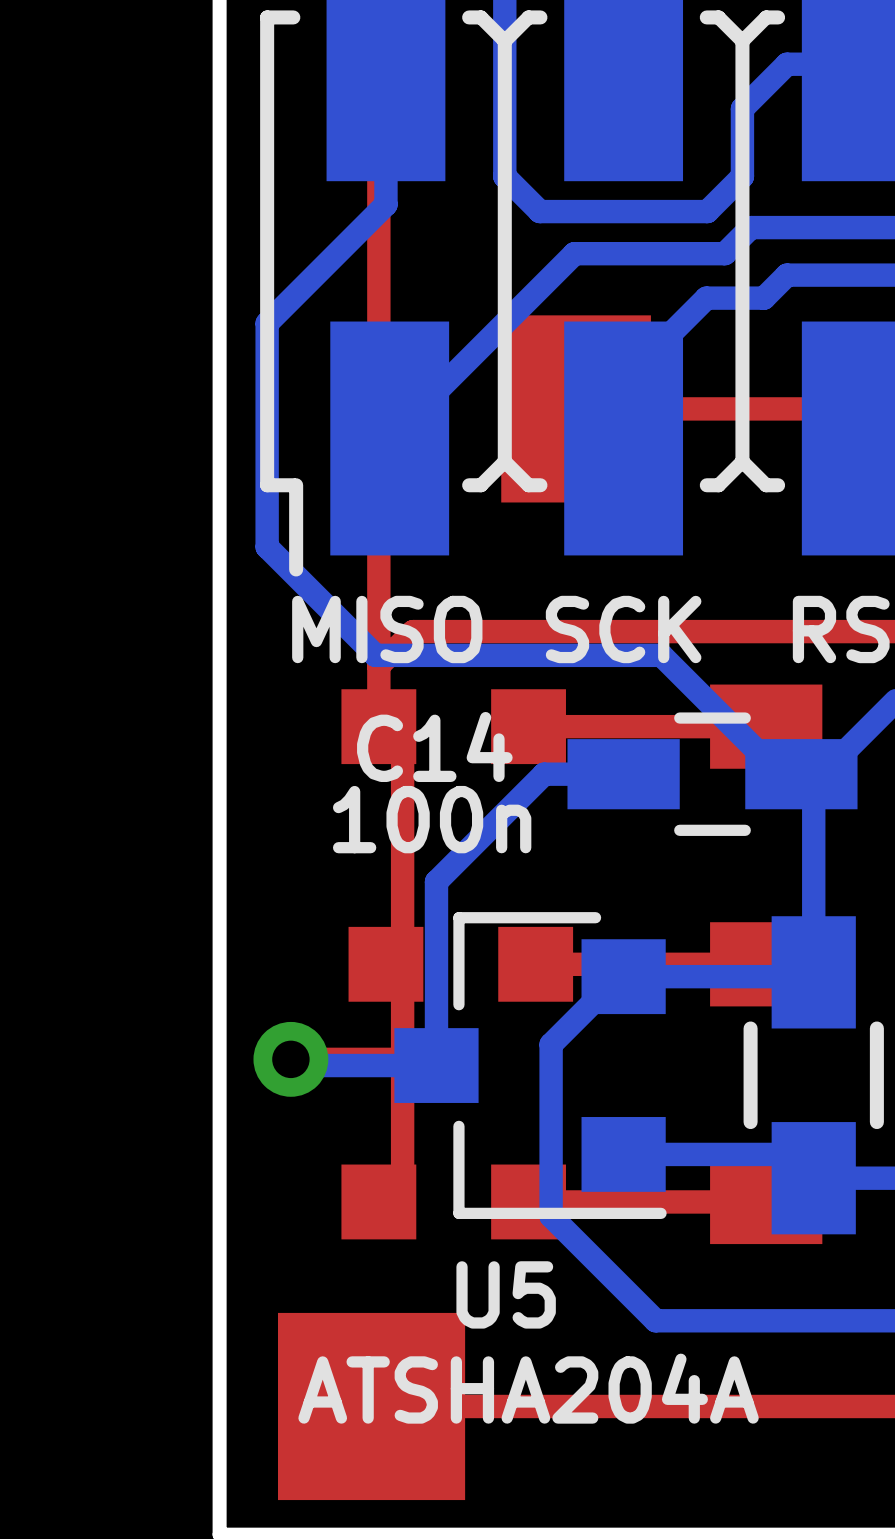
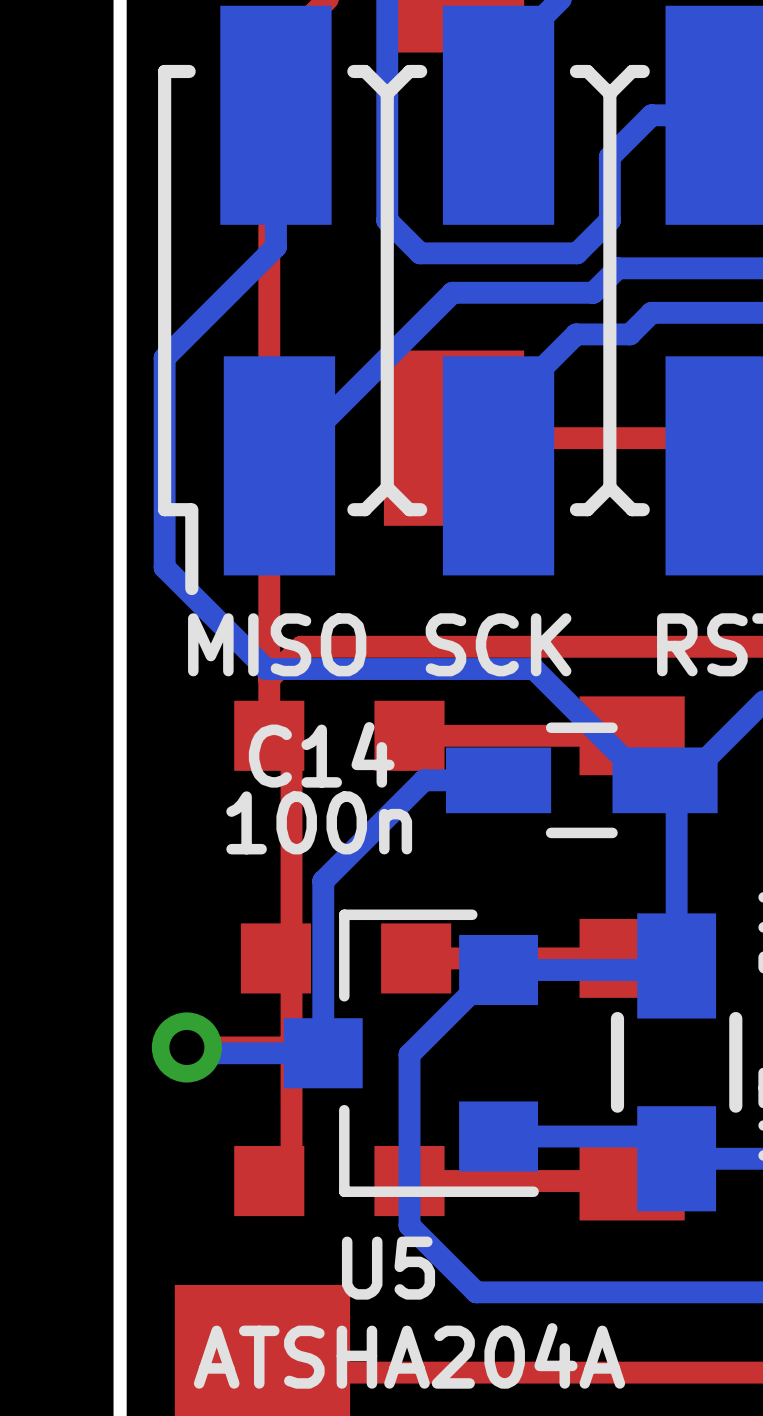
bottom track: (551, 1044) (551, 1216) (655, 1320) -> (430, 1033) (409, 1054) (409, 1225) (476, 1292) (528, 1292)

